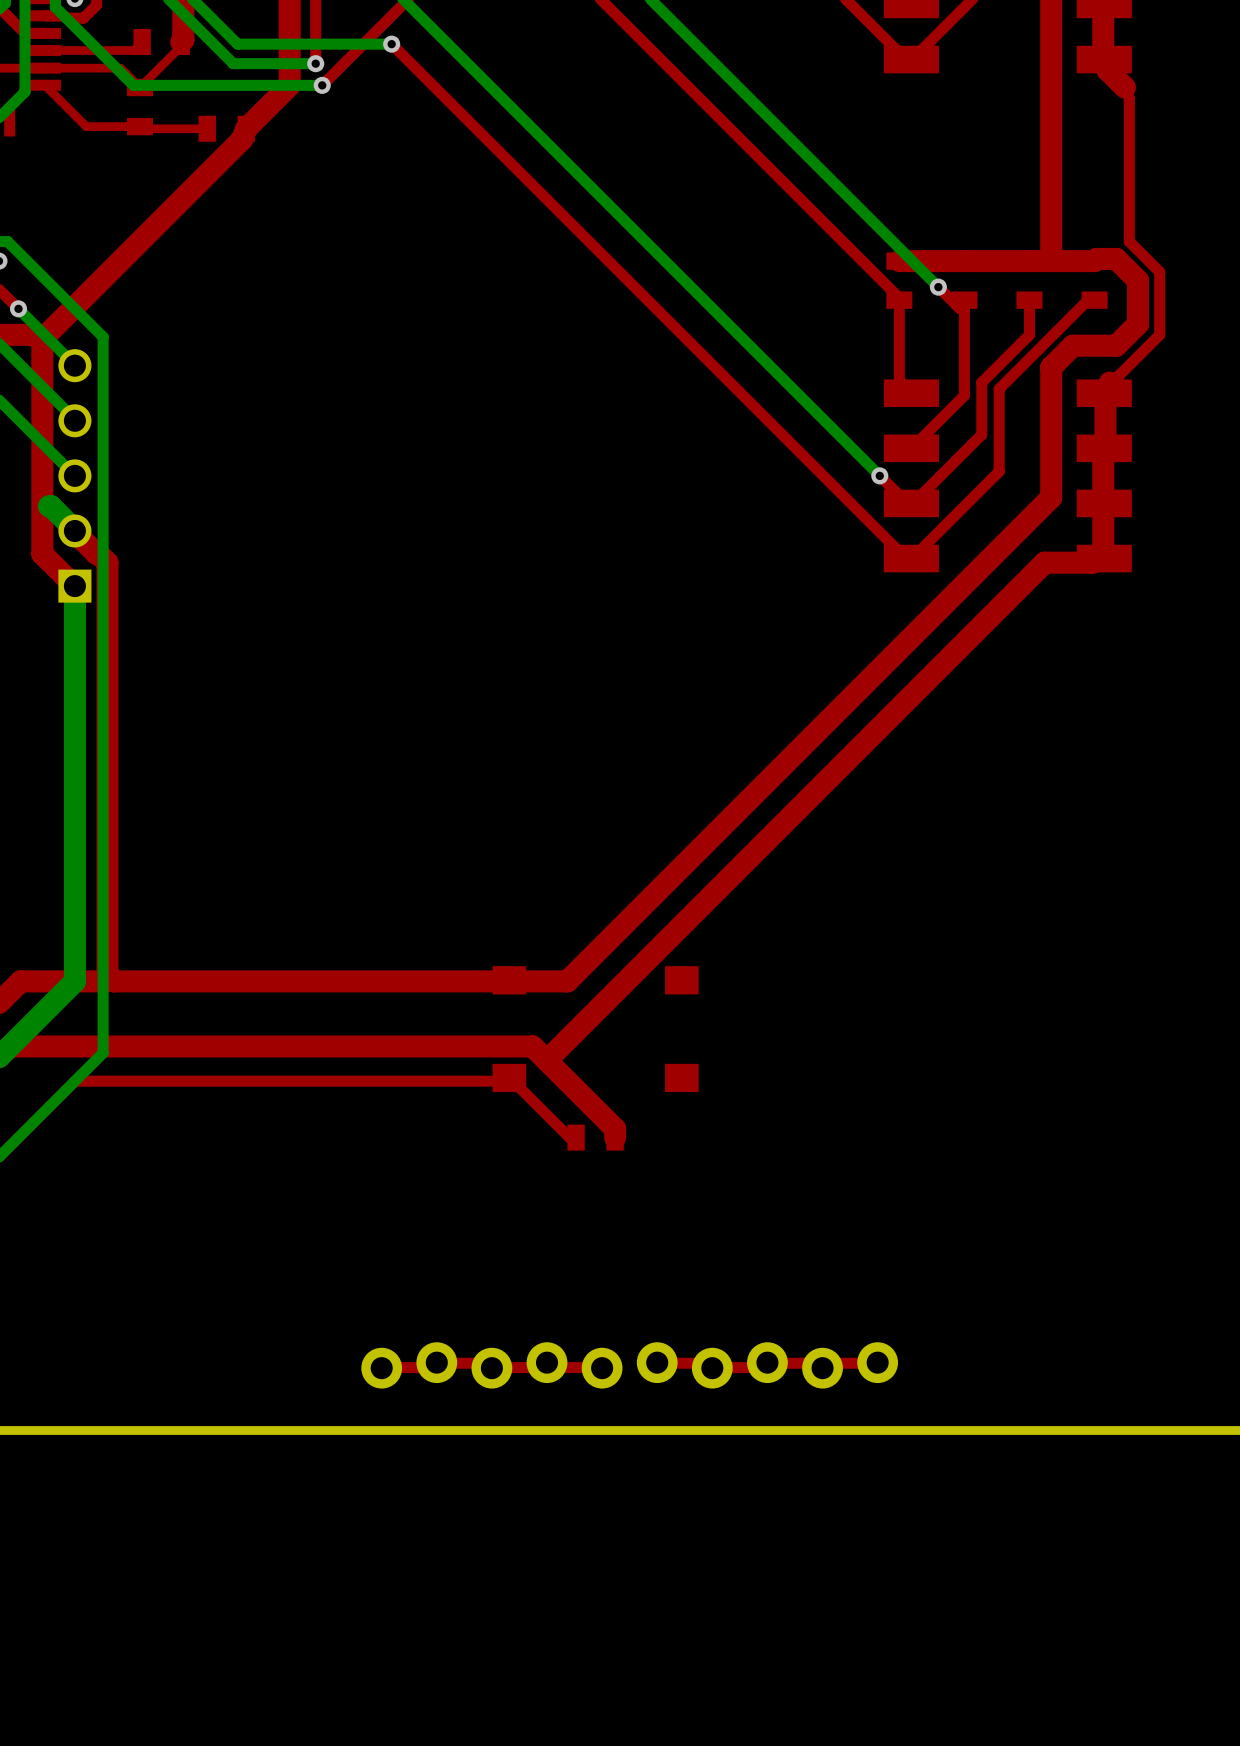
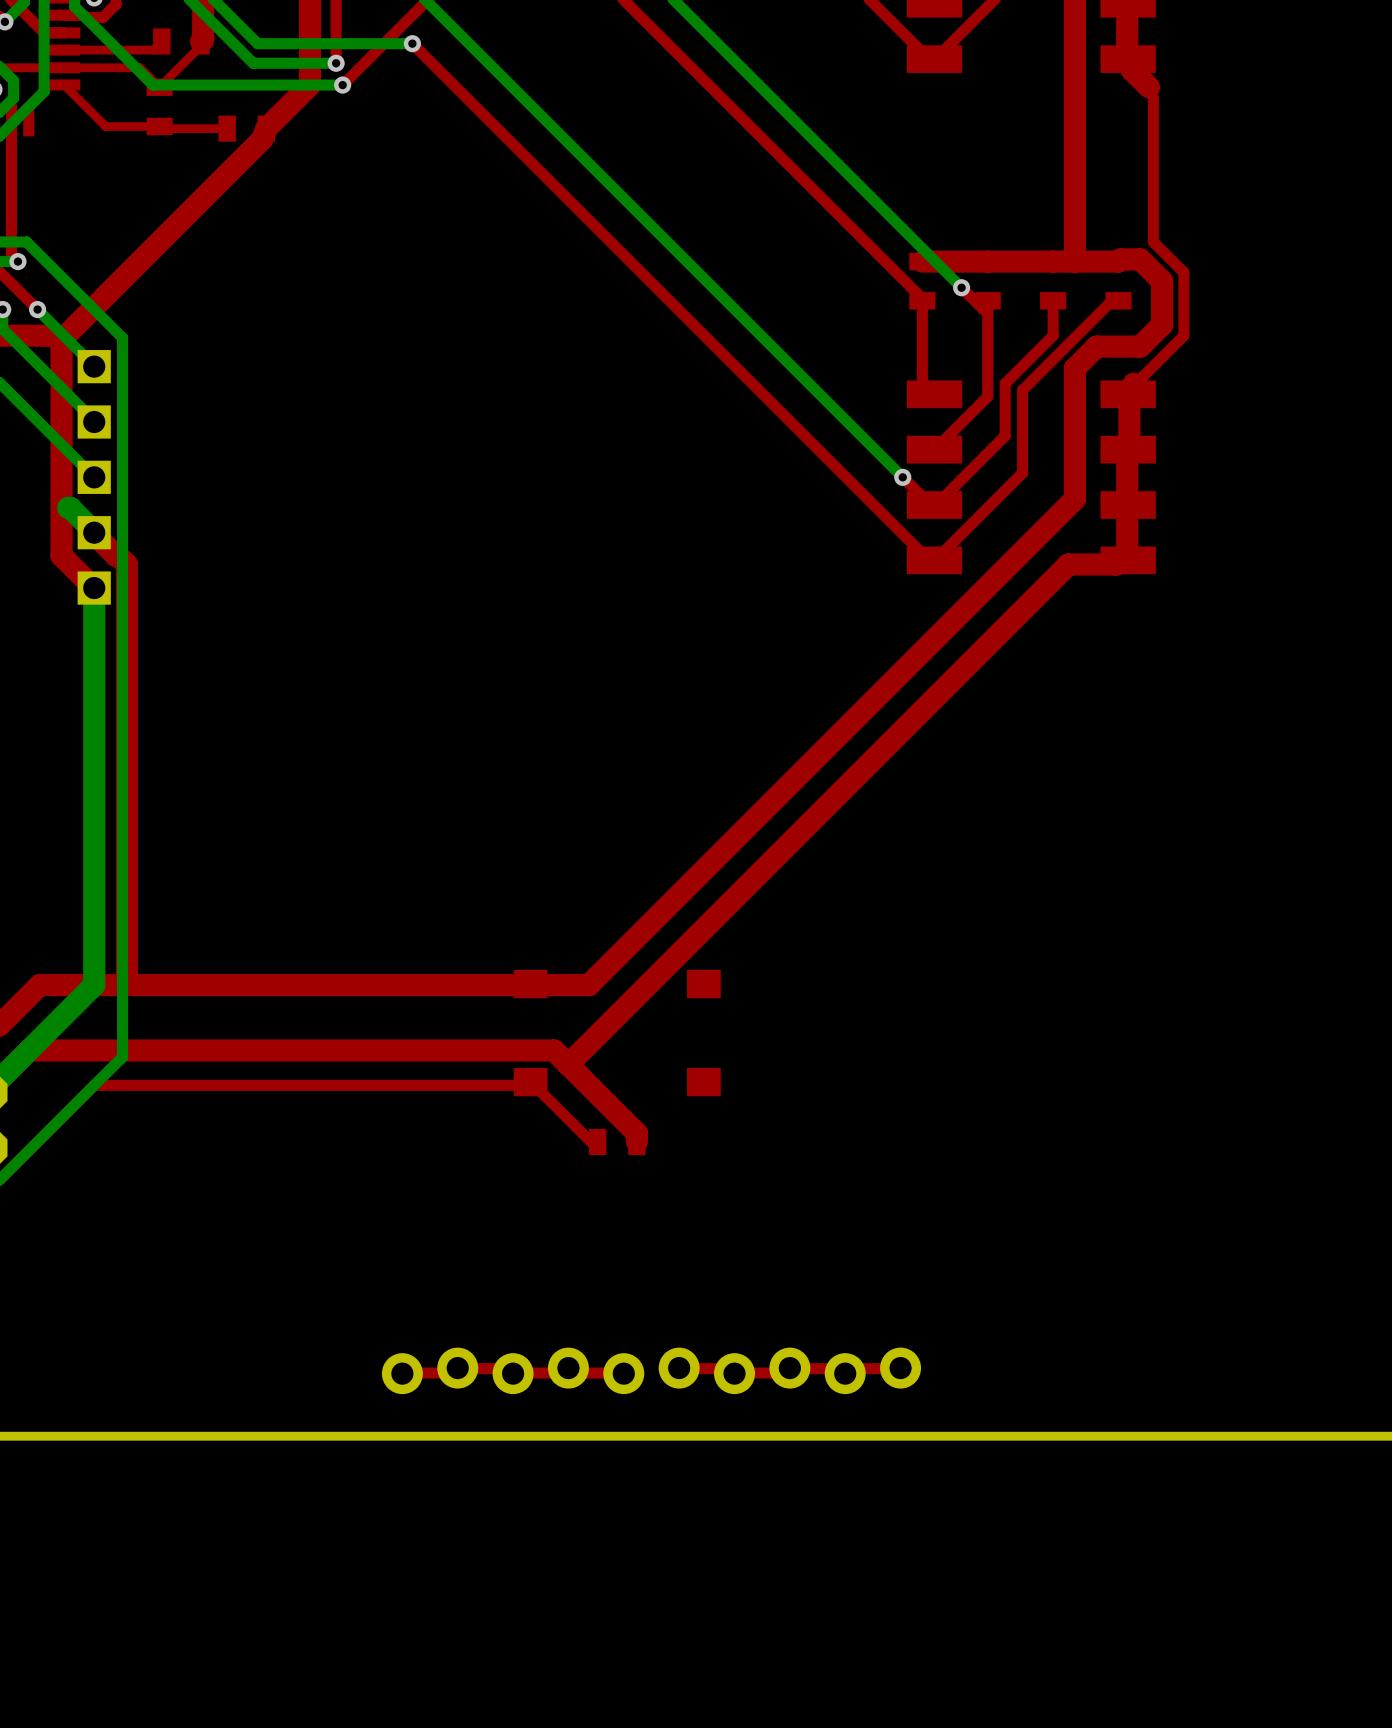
part footprint: [58, 349, 92, 603] -> [77, 350, 111, 605]

